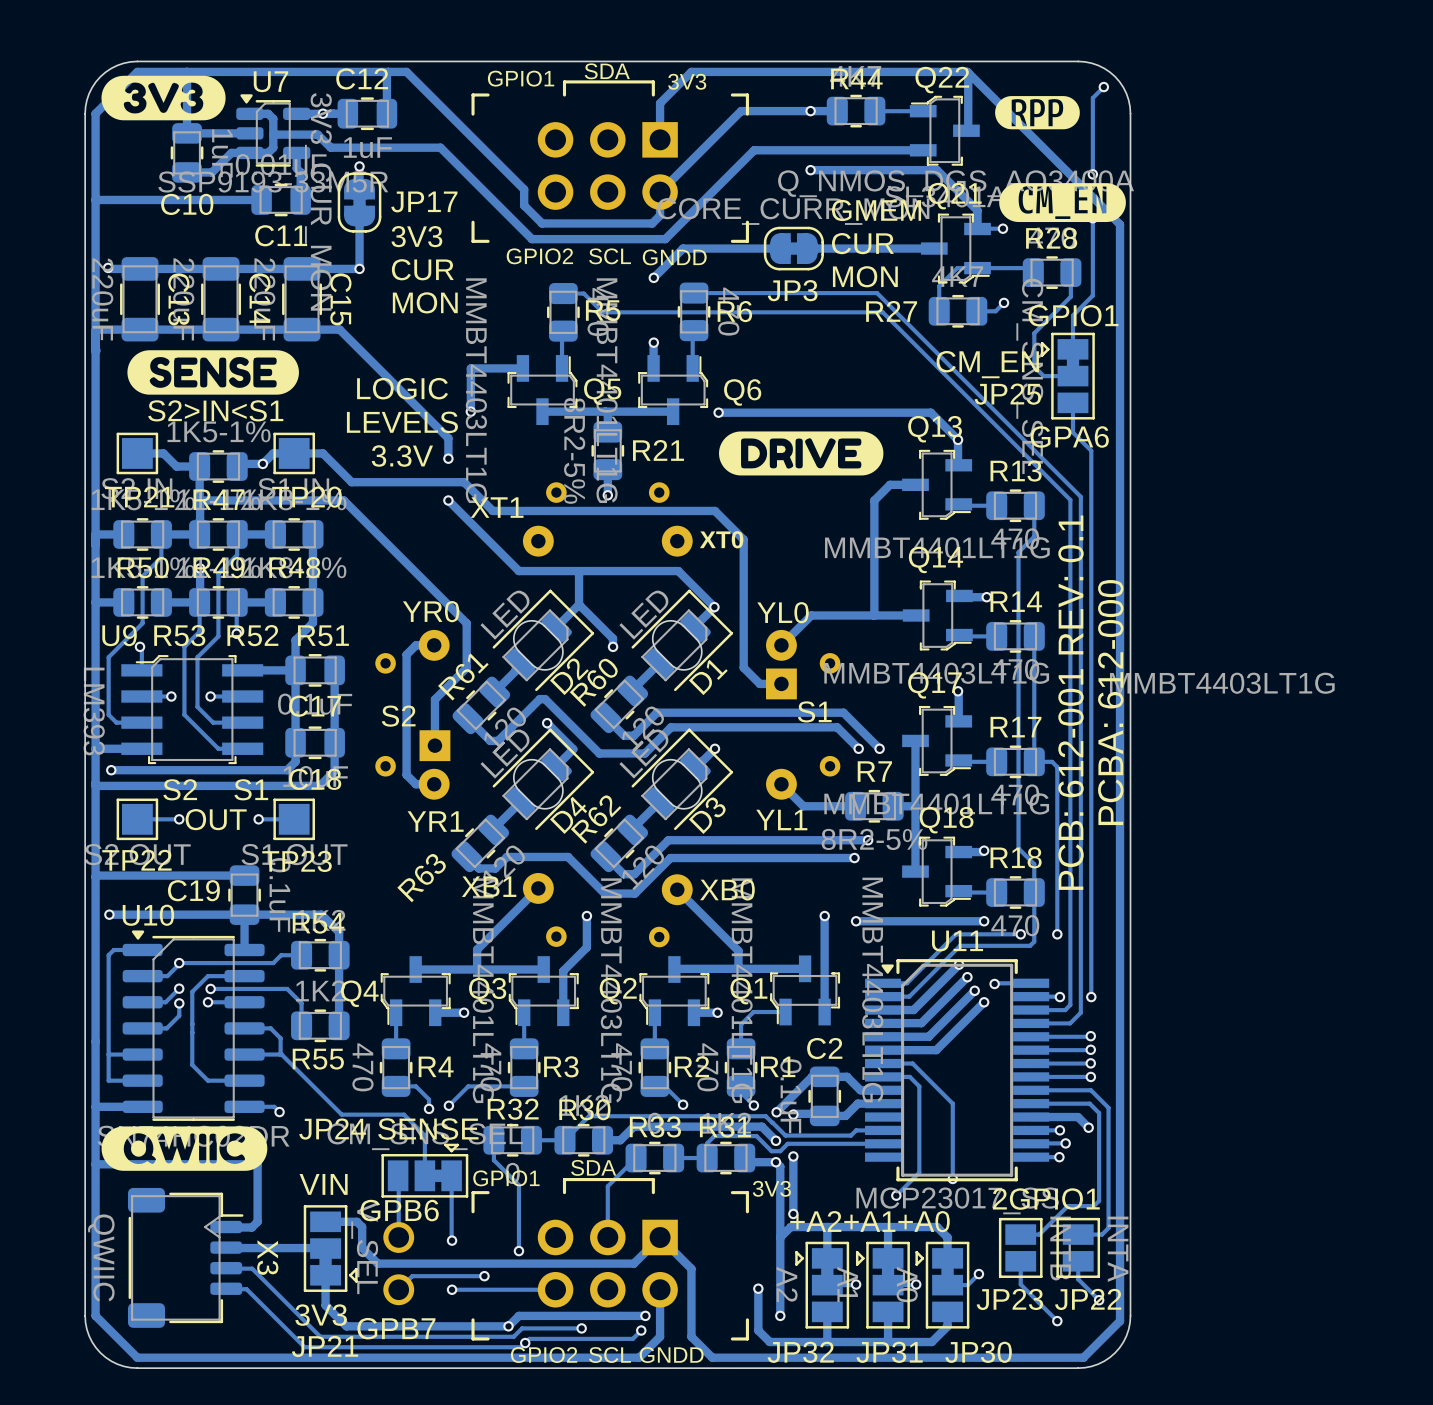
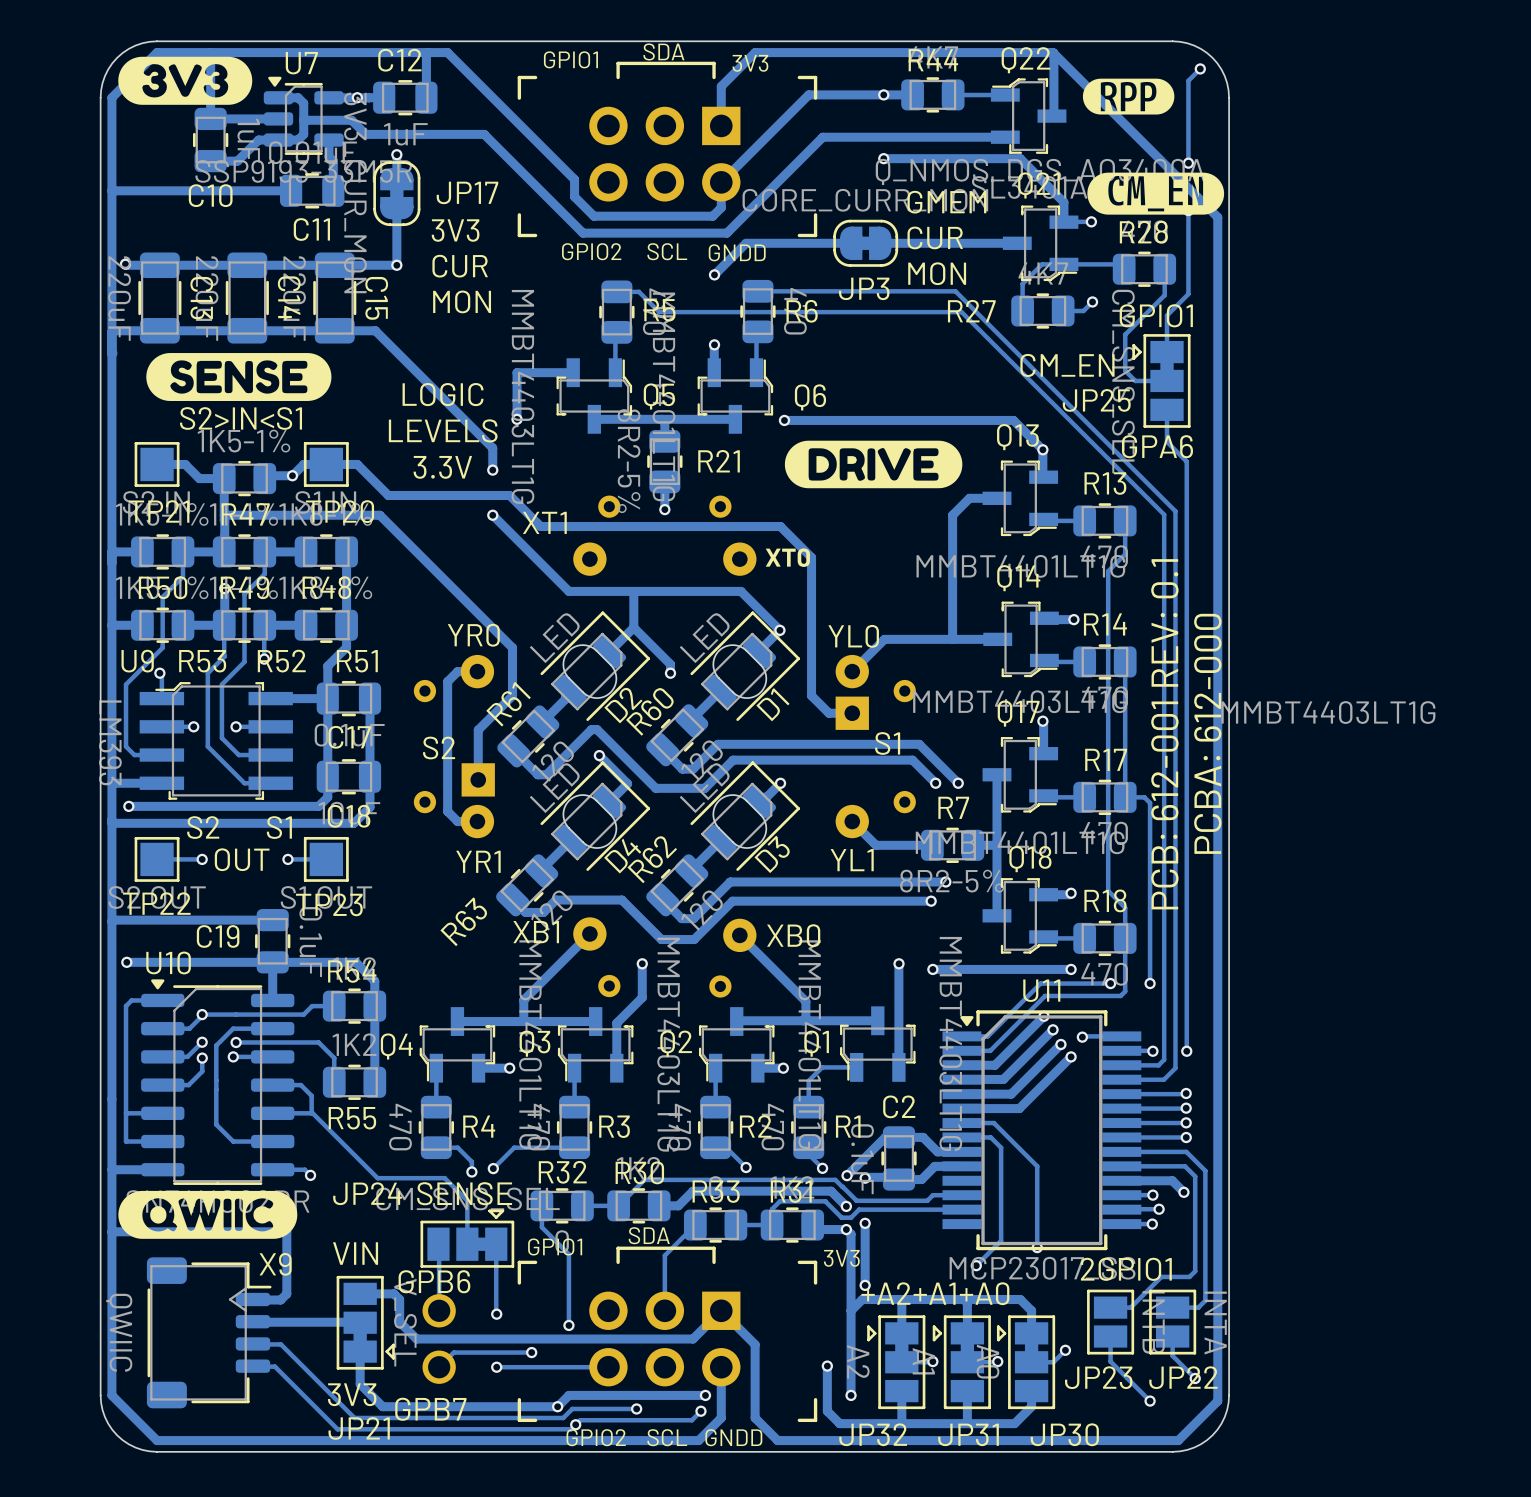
X3 name: X3 (267, 1257) -> X9 (275, 1264)

